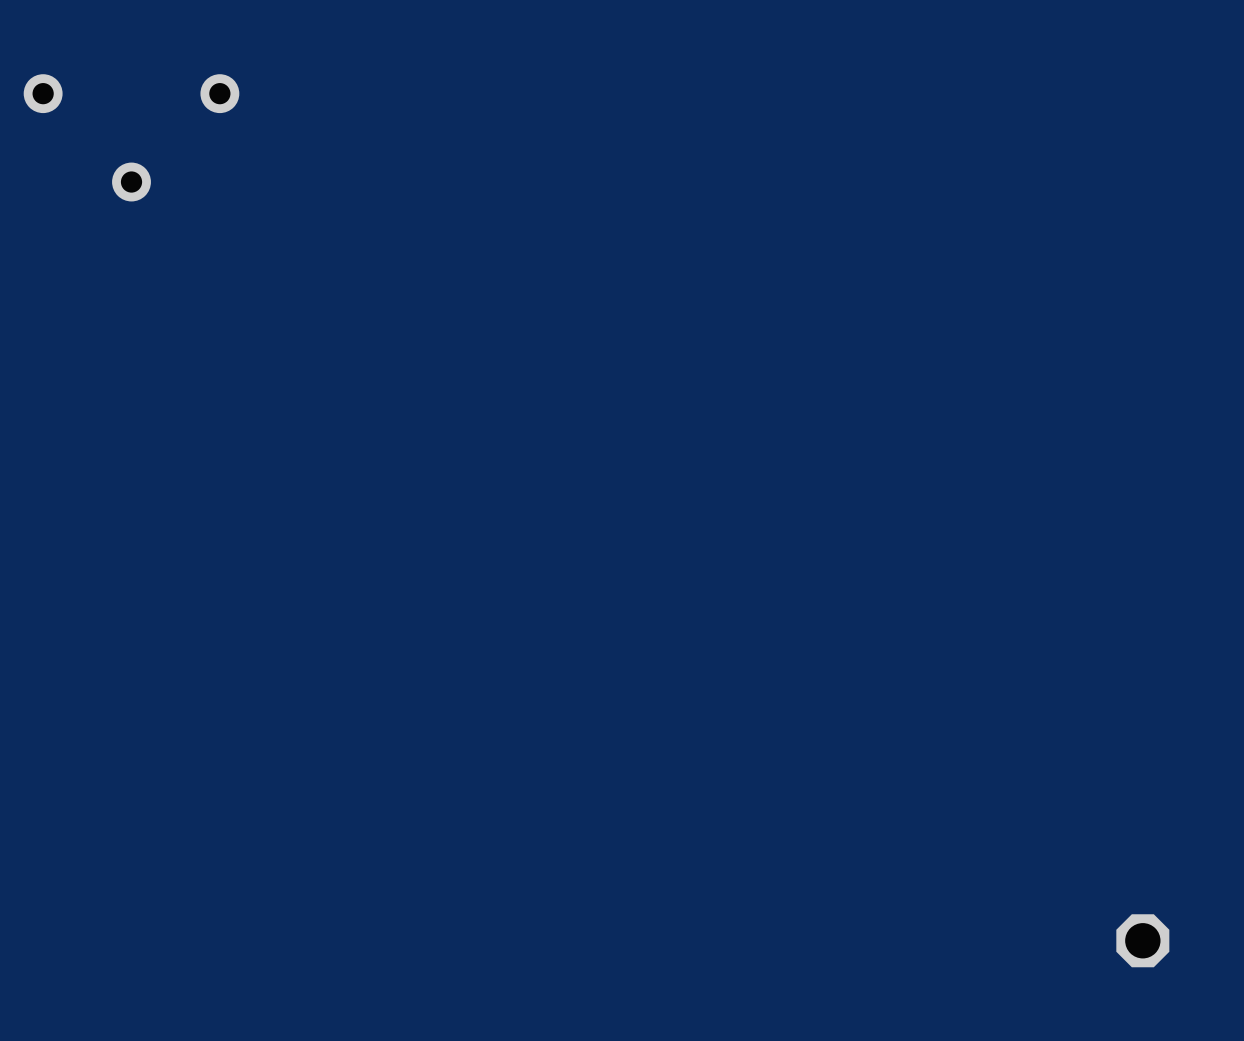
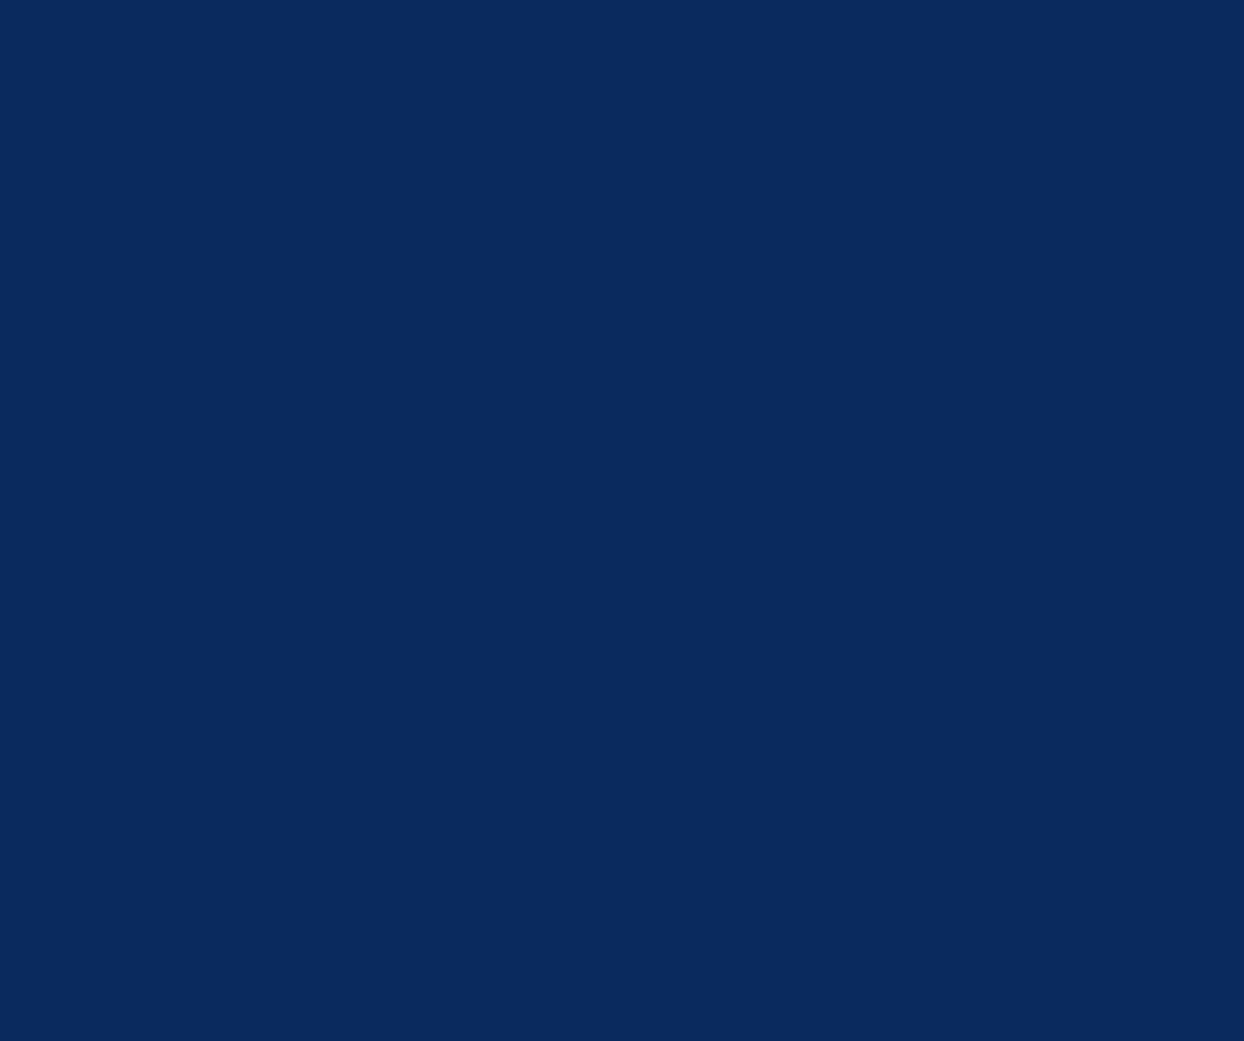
part: (131, 137) -> none
part: (1142, 940) -> none

